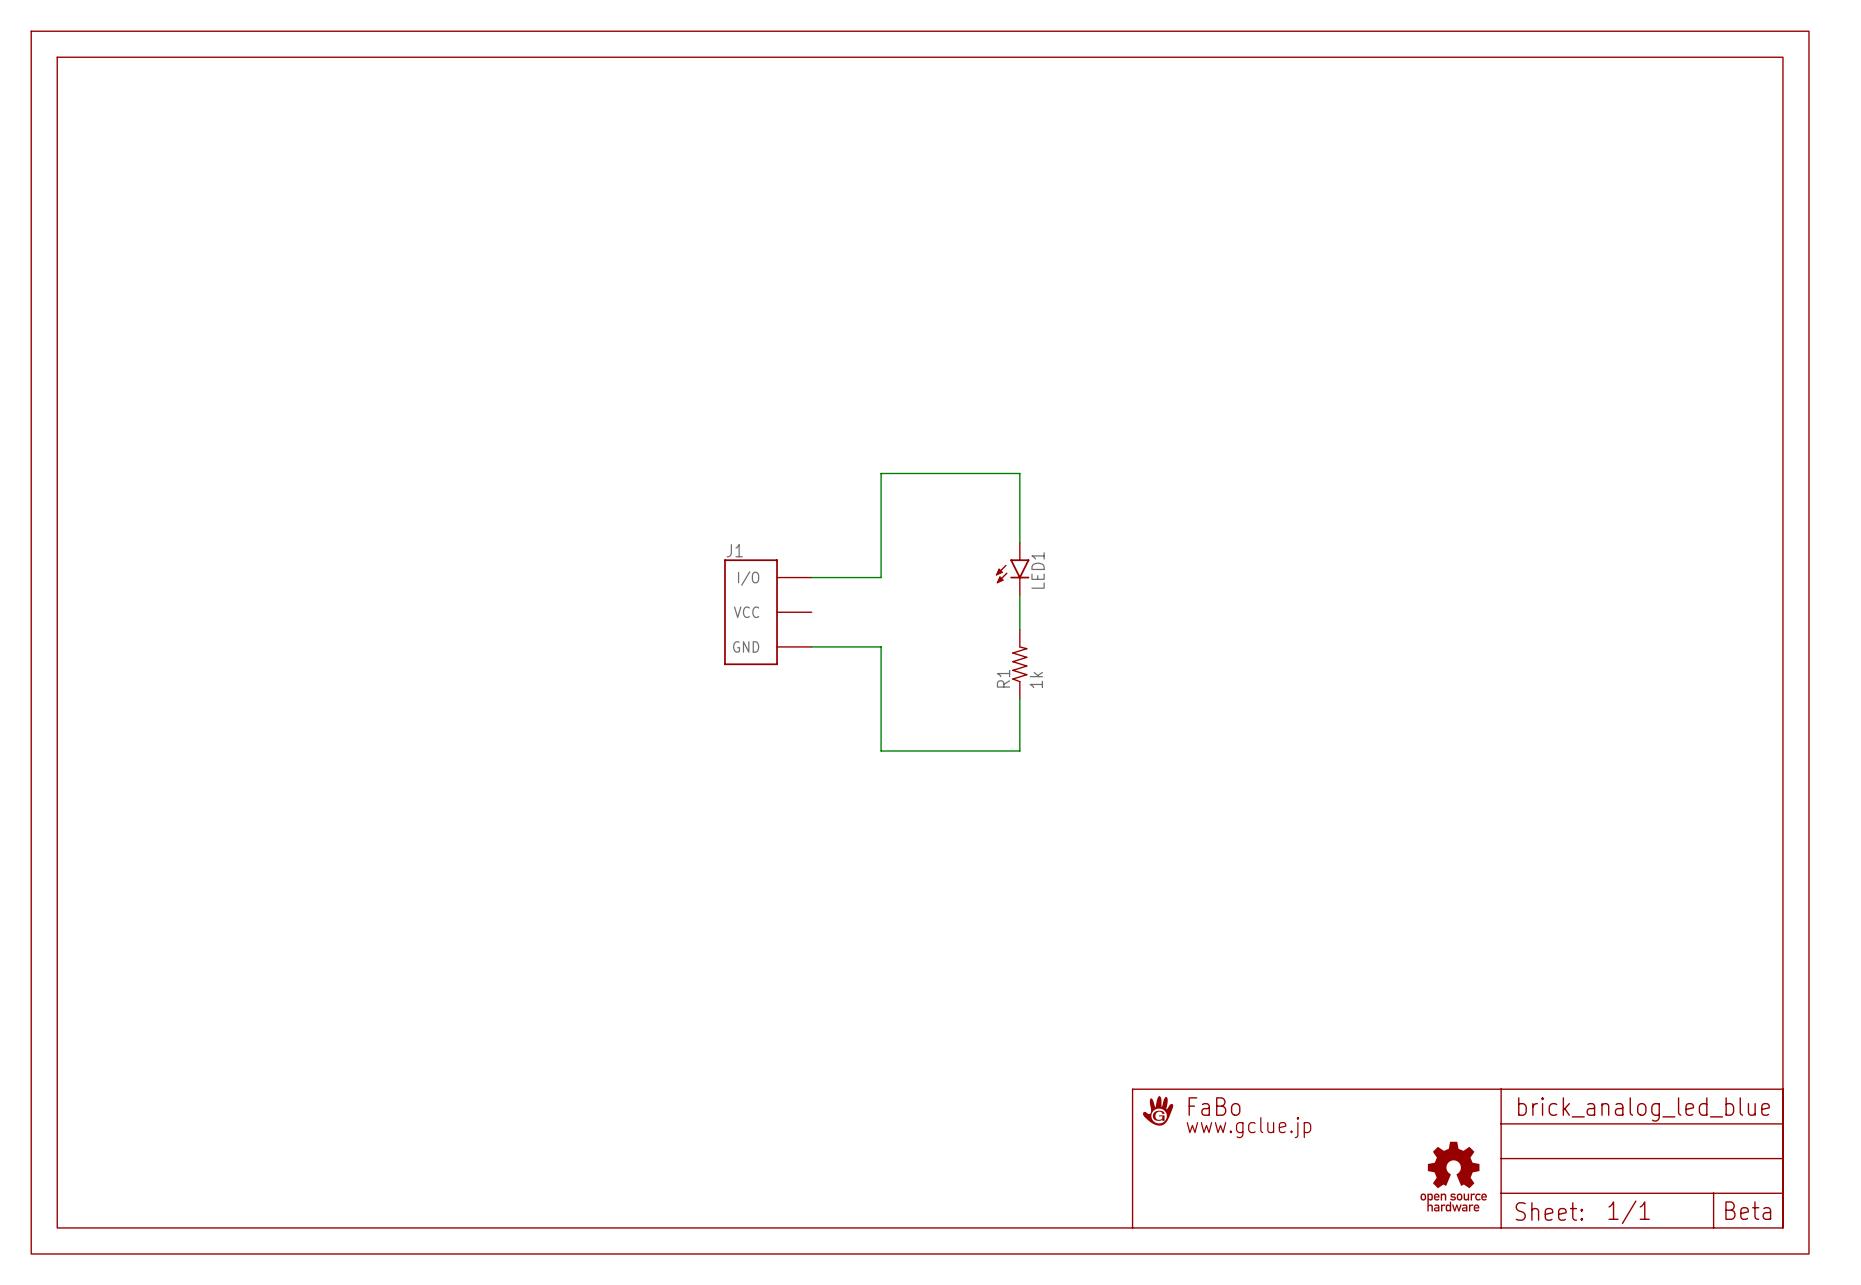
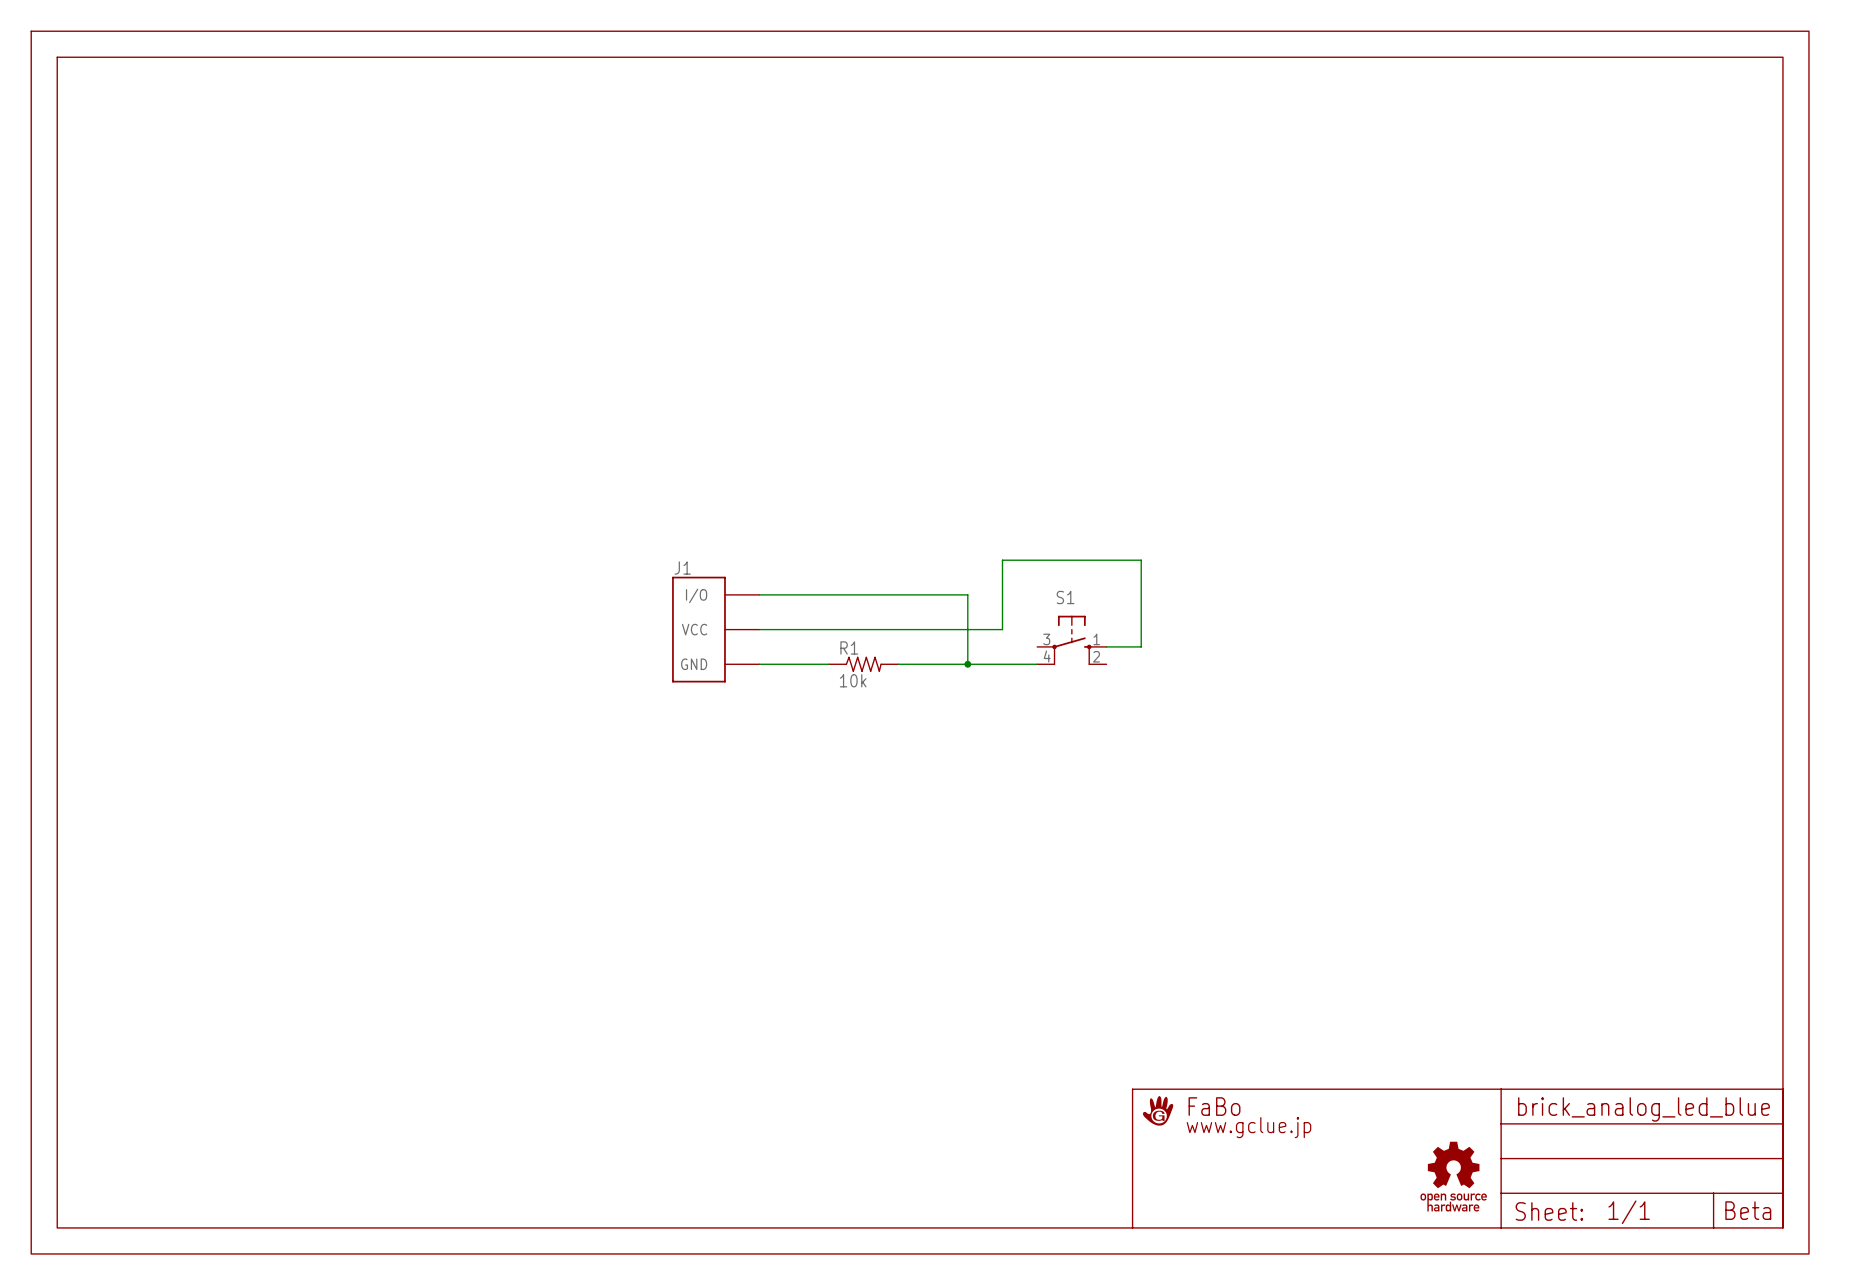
wire: (1019, 542) (1019, 473) (881, 473) (881, 577) (811, 577) -> none
LED1: (1012, 568) -> none
wire: none -> (759, 594) (967, 594) (967, 664)
wire: (1019, 594) (1019, 629) -> none
J1 position: (767, 612) -> (715, 629)
wire: none -> (759, 629) (1002, 629) (1002, 560) (1141, 560) (1141, 646) (1106, 646)
S1: none -> (1071, 640)
wire: (811, 646) (881, 646) (881, 751) (1019, 751) (1019, 698) -> none
wire: none -> (759, 664) (829, 664)
wire: none -> (898, 664) (1037, 664)
junction: none -> (967, 664)
R1 rotation: 0° (1019, 664) -> 90° clockwise (863, 664)
R1 position: (1019, 664) -> (863, 664)
R1 value: 1k (1036, 680) -> 10k (853, 680)

